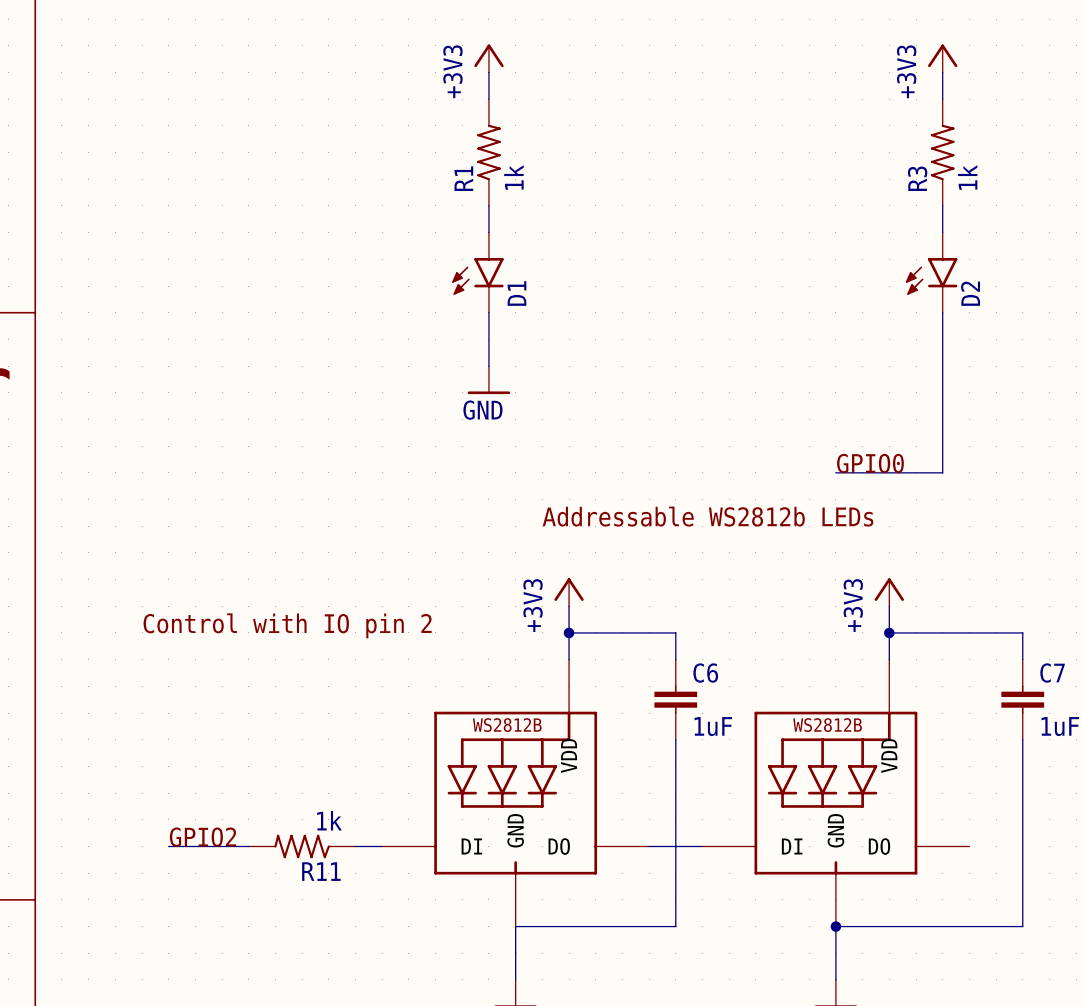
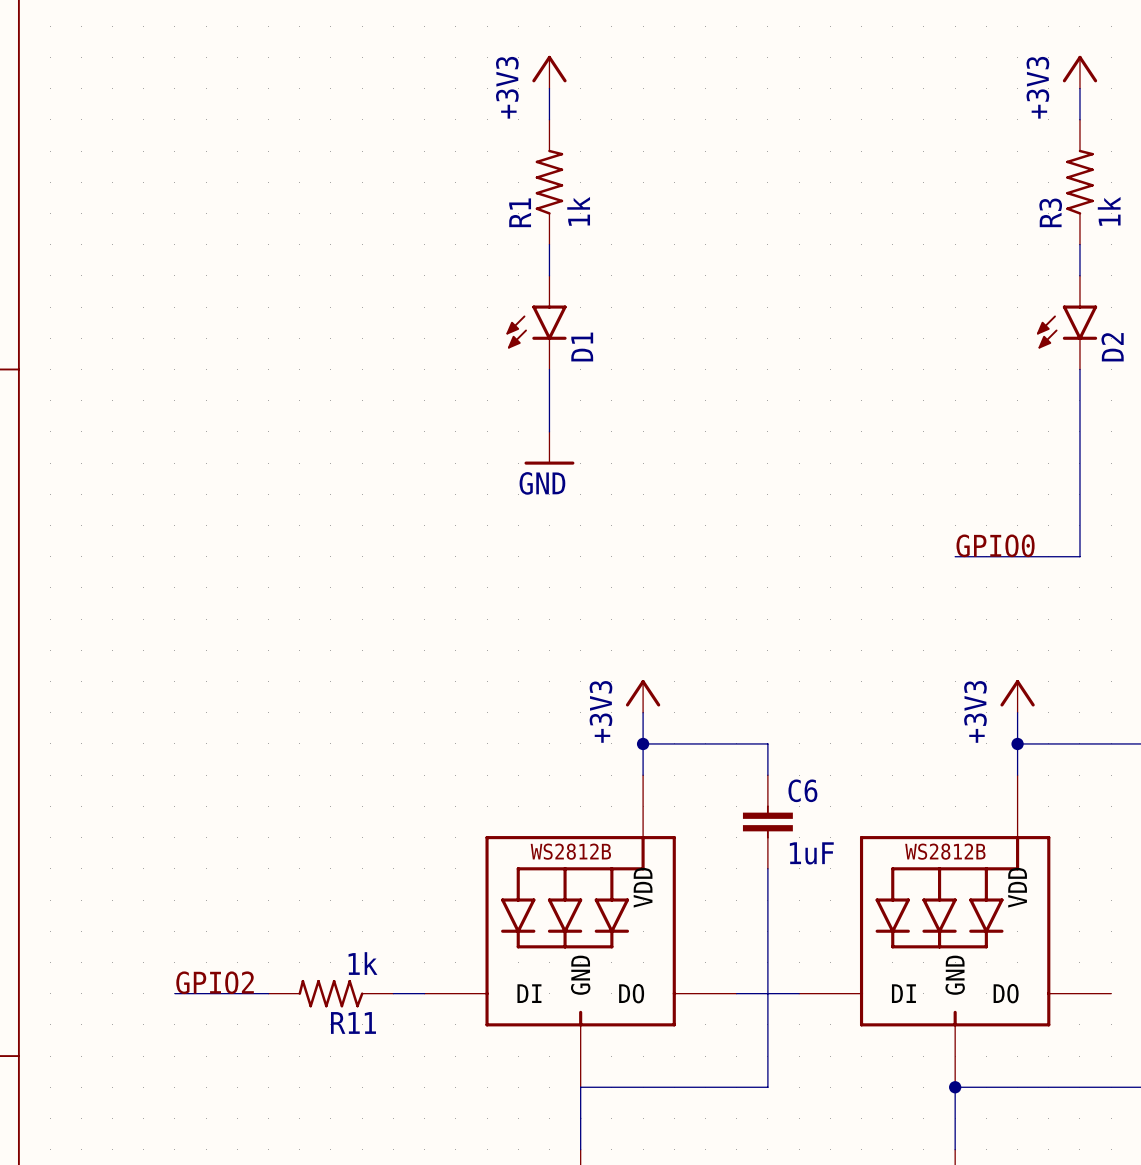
text: Addressable WS2812b LEDs (708, 516) -> none
text: Control with IO pin 2 (287, 625) -> none

